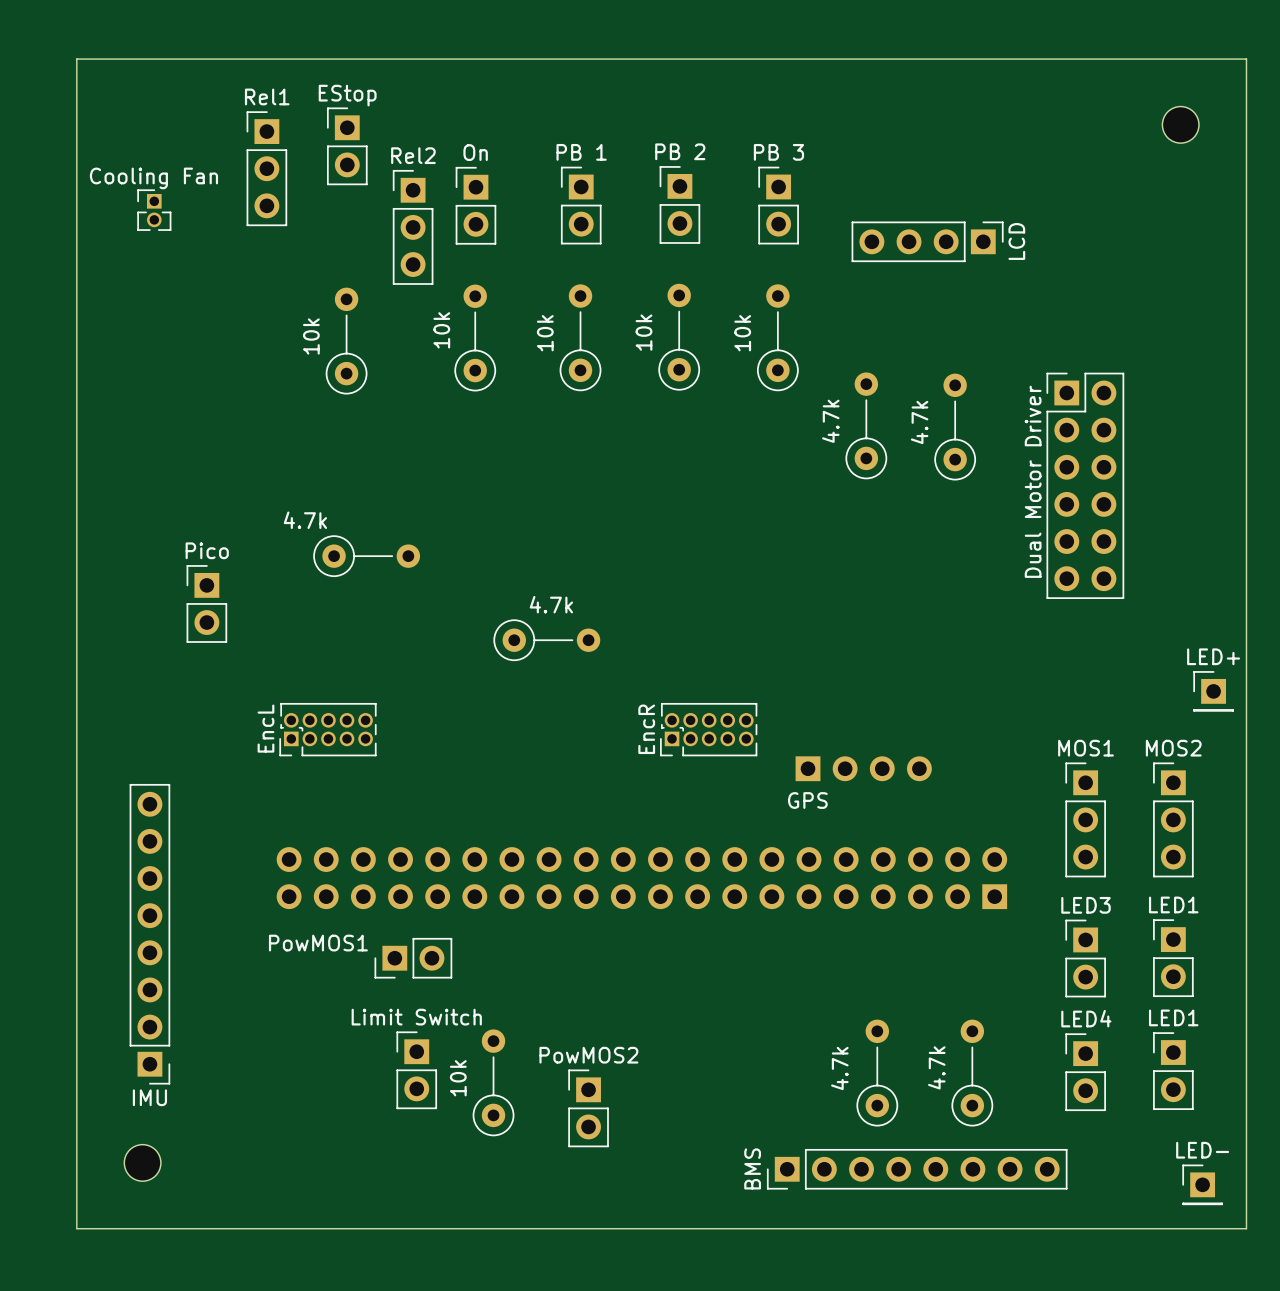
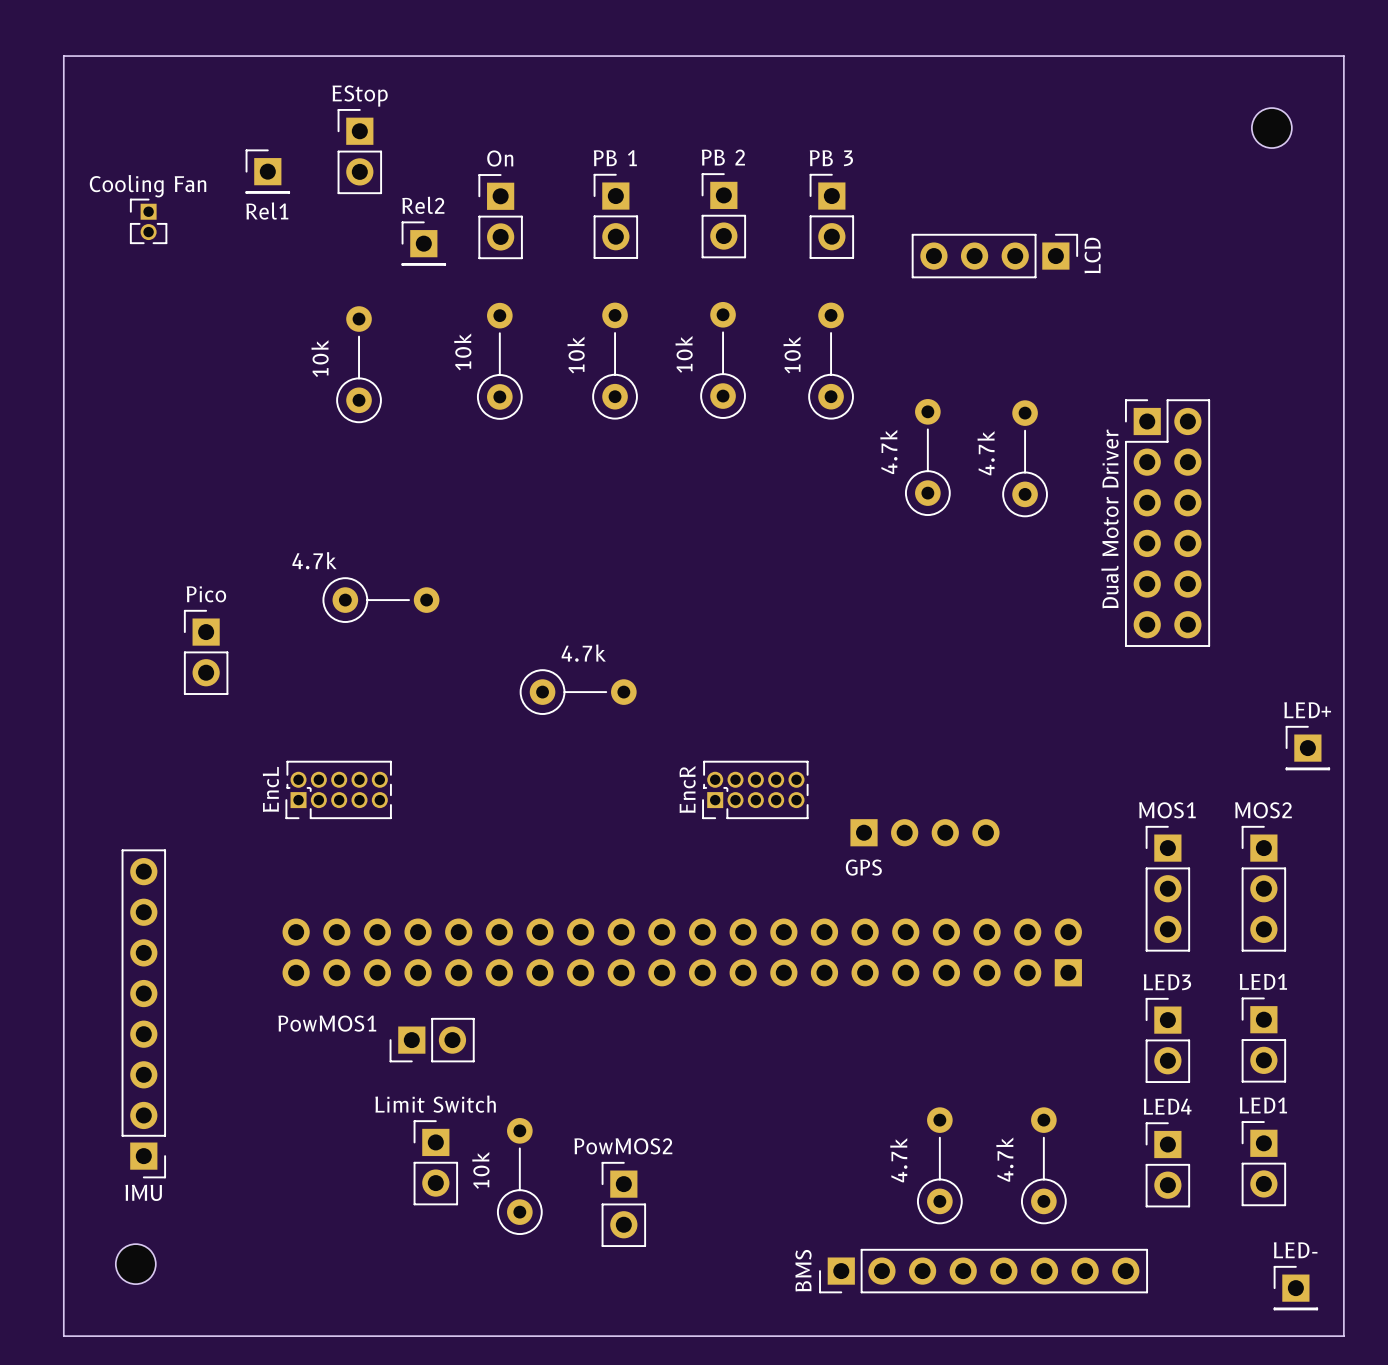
Rel1 name position: Rel1 (267, 96) -> Rel1 (267, 211)
Rel1 footprint: [246, 111, 288, 227] -> [245, 149, 291, 194]
Rel2 name position: Rel2 (413, 155) -> Rel2 (423, 205)
Rel2 footprint: [392, 169, 434, 285] -> [401, 221, 447, 266]

